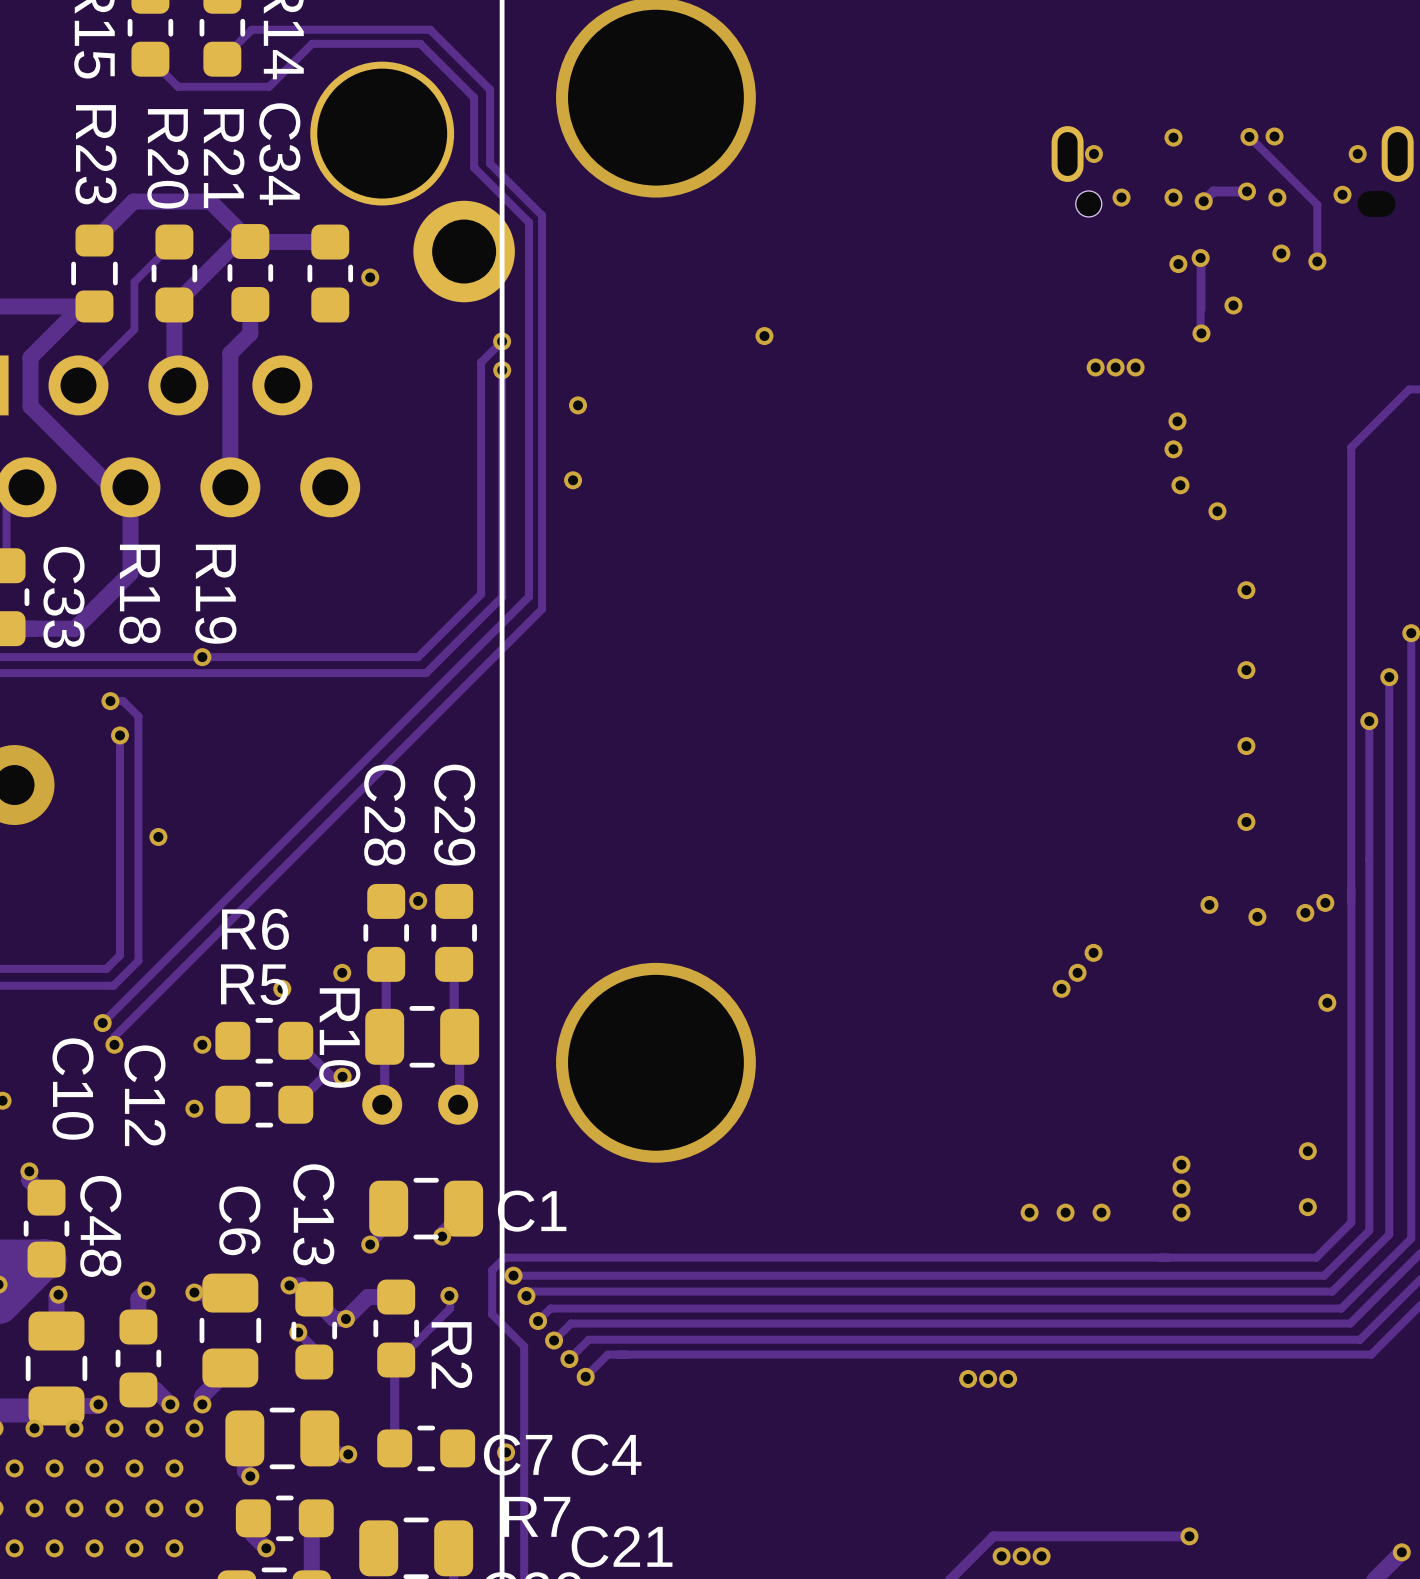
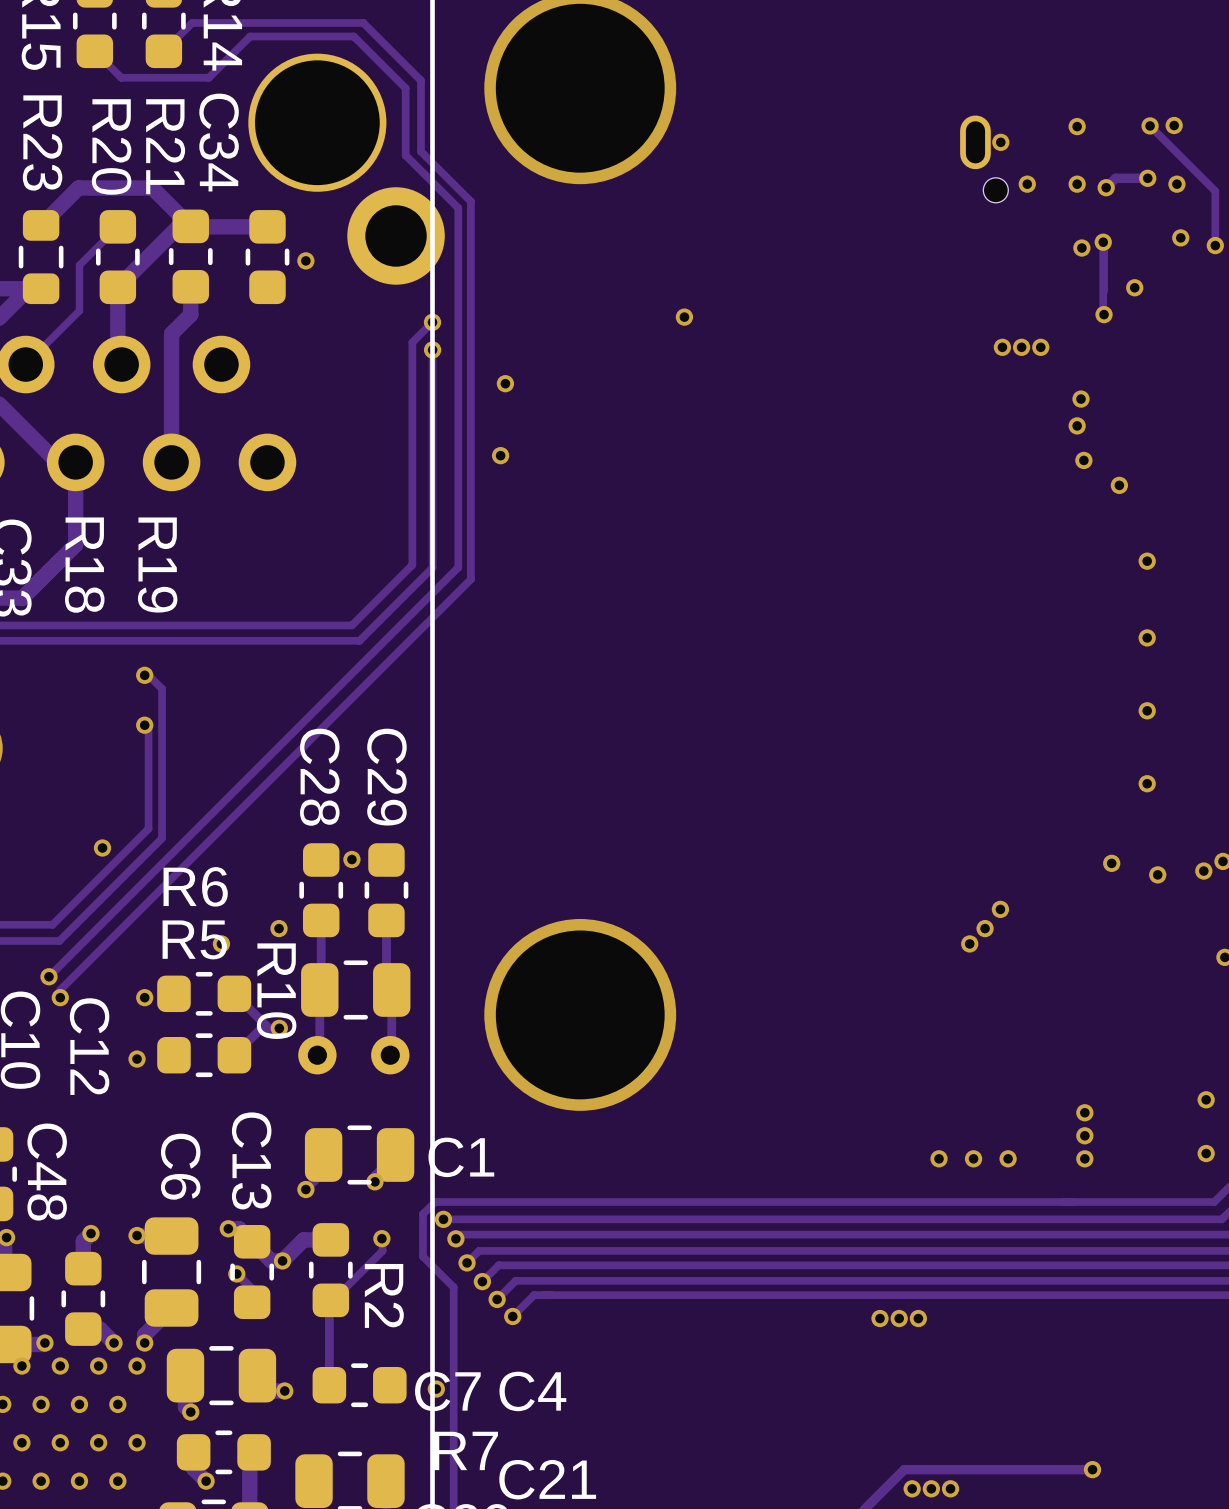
via: (202, 657) -> none
track: (110, 701) (123, 701) (138, 716) (138, 960) -> (144, 675) (148, 675) (162, 688) (162, 838) (83, 917)
via: (110, 701) -> none
via: none -> (144, 675)
track: (120, 735) (120, 955) -> (144, 725) (148, 729) (148, 828) (65, 911)
via: (120, 735) -> none
via: none -> (144, 725)
via: (158, 836) -> none
via: none -> (102, 848)

